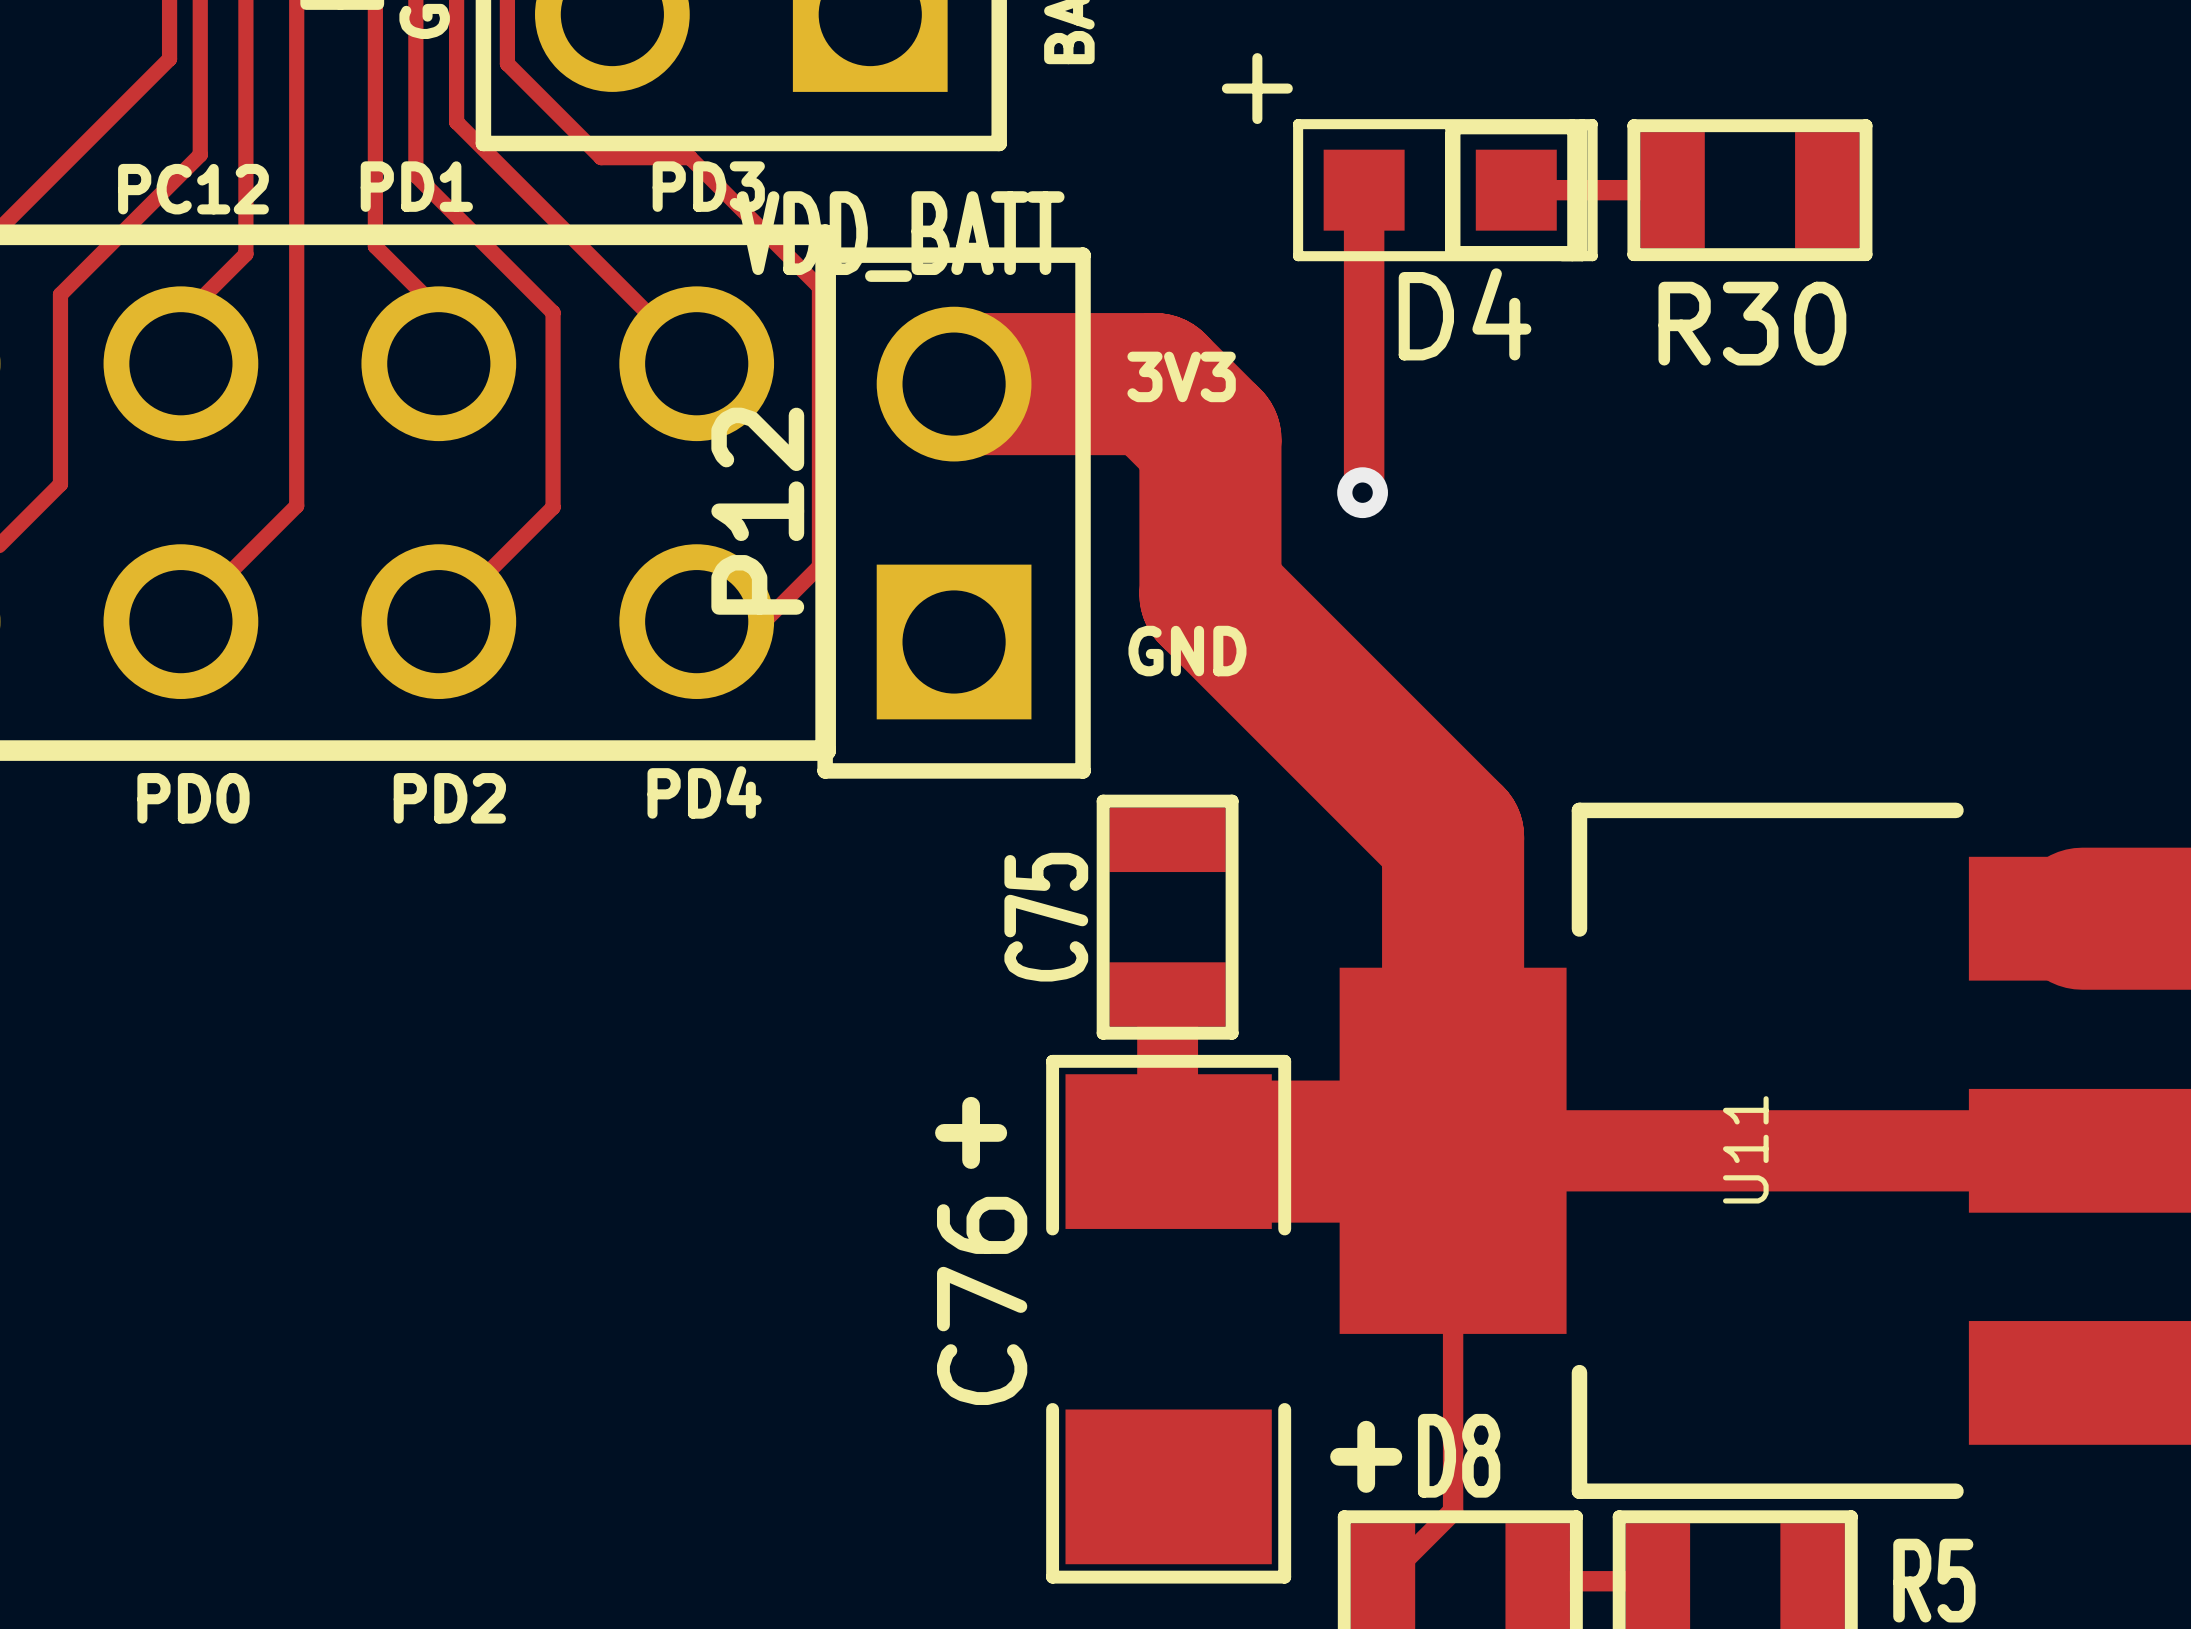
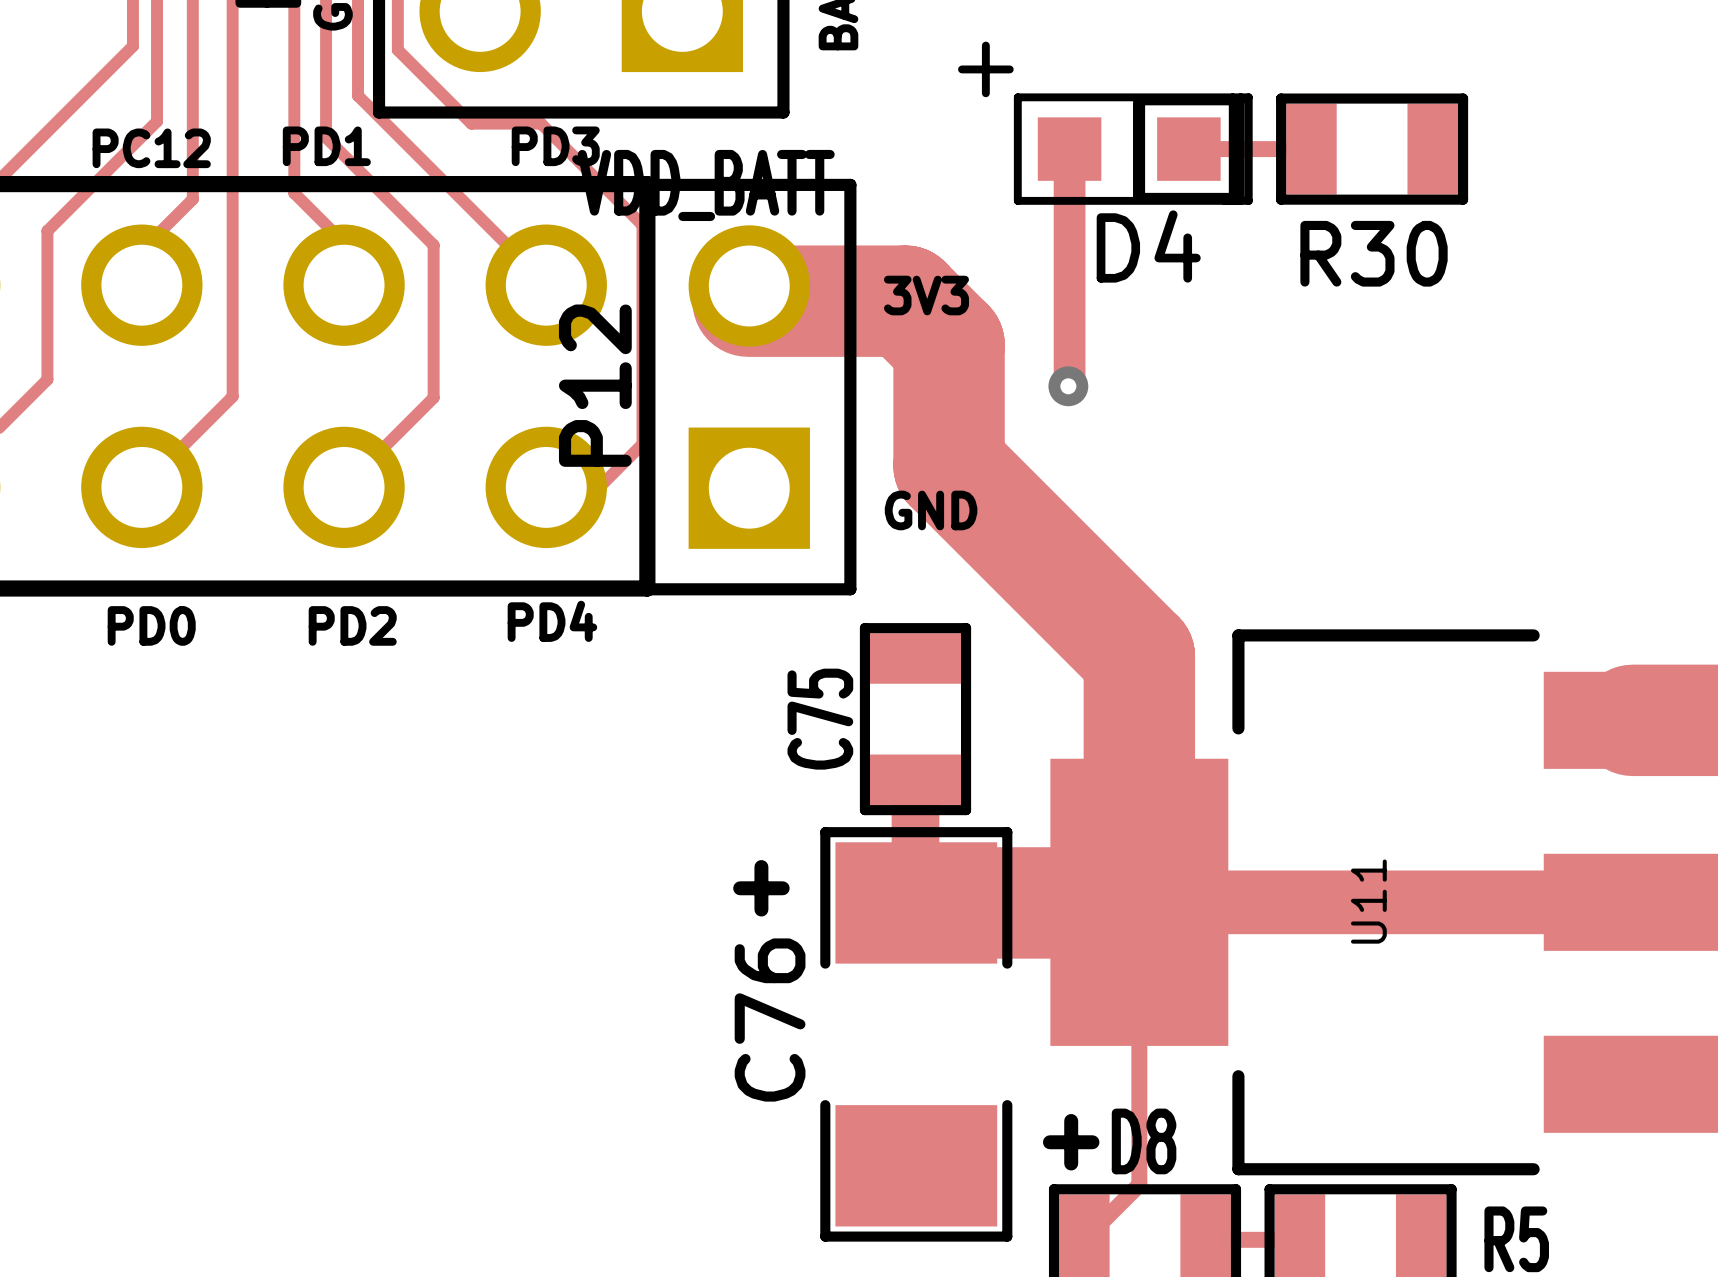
P12 position: (954, 513) -> (749, 387)

